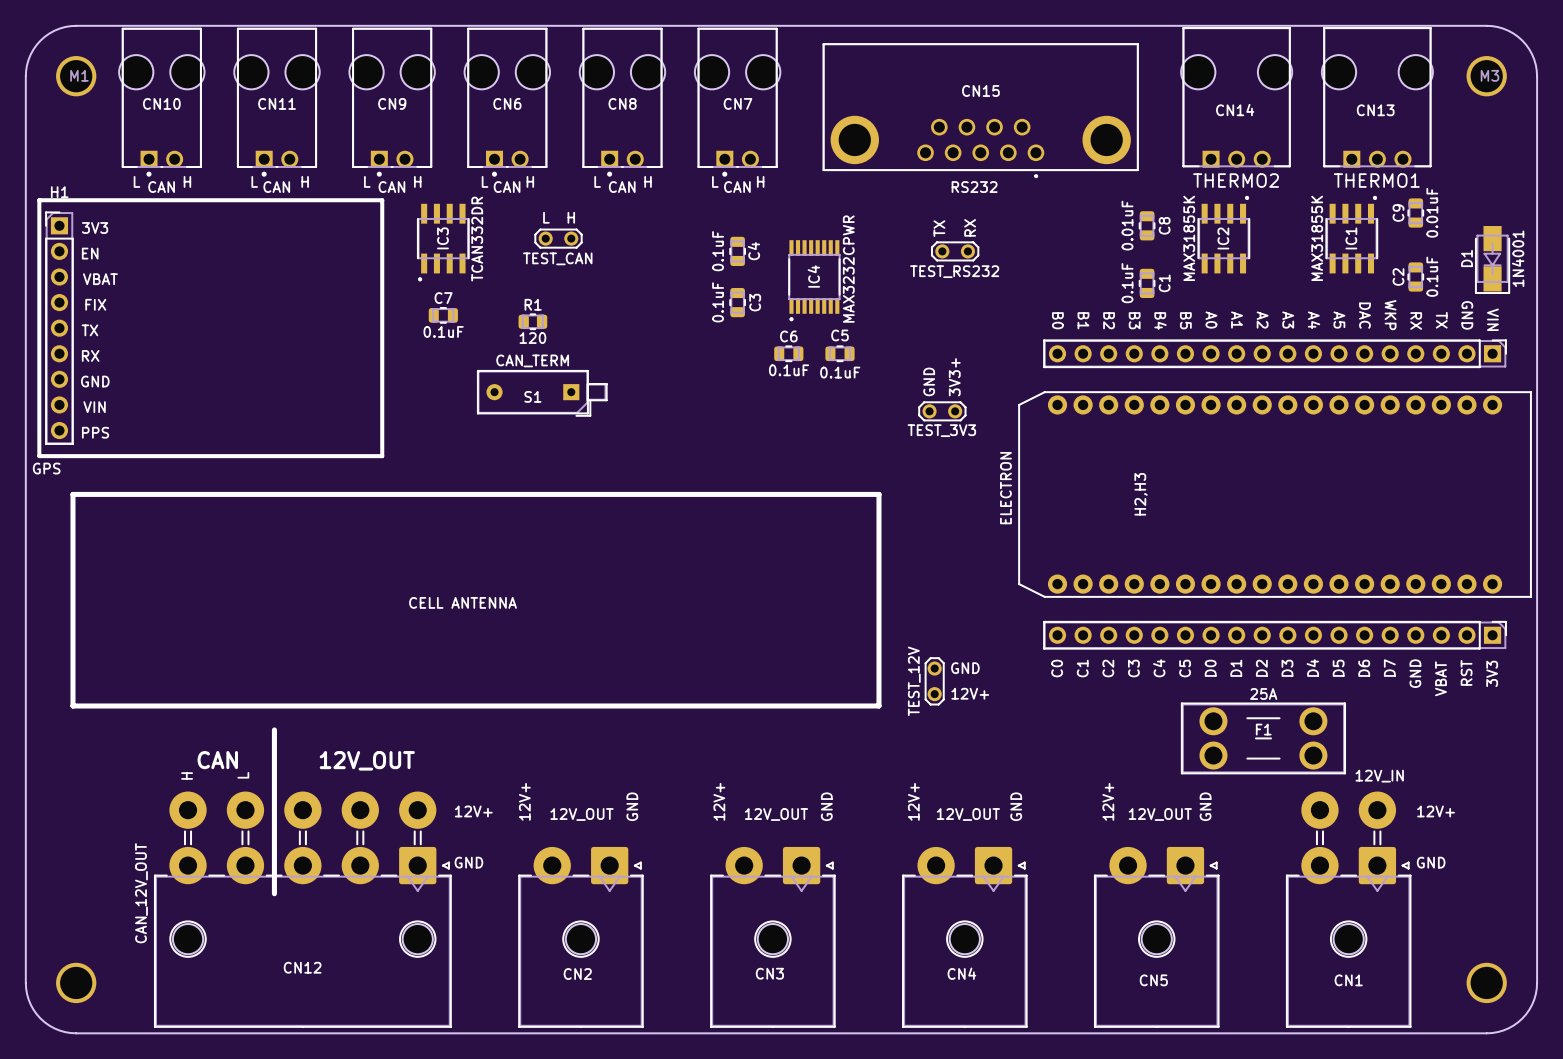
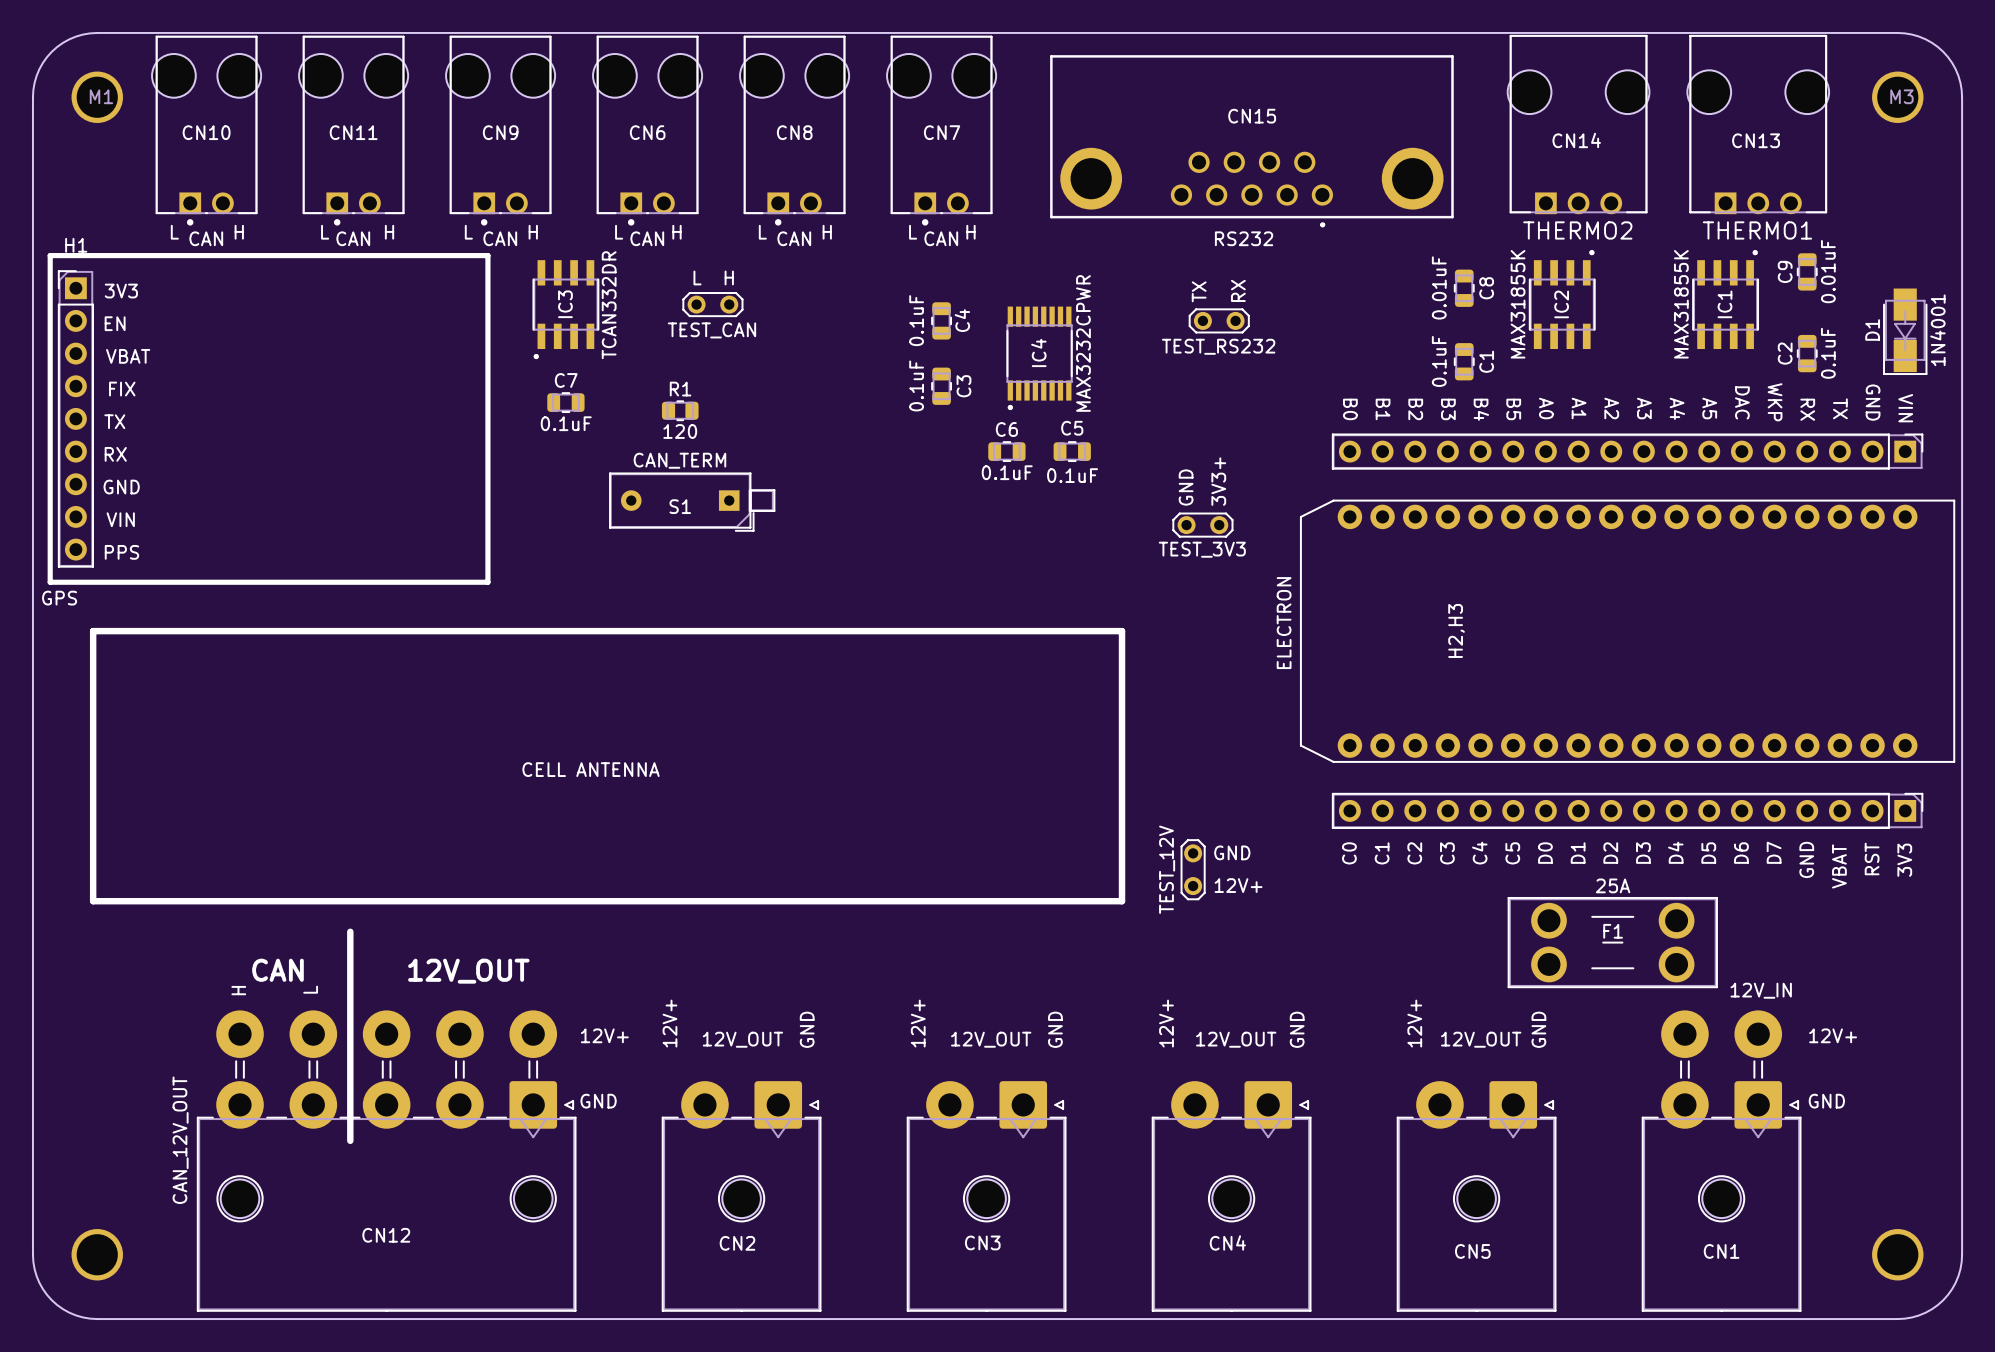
CN10 footprint: [119, 27, 205, 177] -> [152, 35, 262, 226]
CN11 footprint: [234, 27, 320, 177] -> [299, 35, 409, 226]
CN9 footprint: [349, 27, 435, 177] -> [446, 35, 556, 226]
CN6 footprint: [464, 27, 551, 177] -> [593, 35, 703, 226]
CN8 footprint: [579, 27, 666, 177] -> [740, 35, 850, 226]
CN7 footprint: [694, 27, 781, 177] -> [887, 35, 997, 226]

